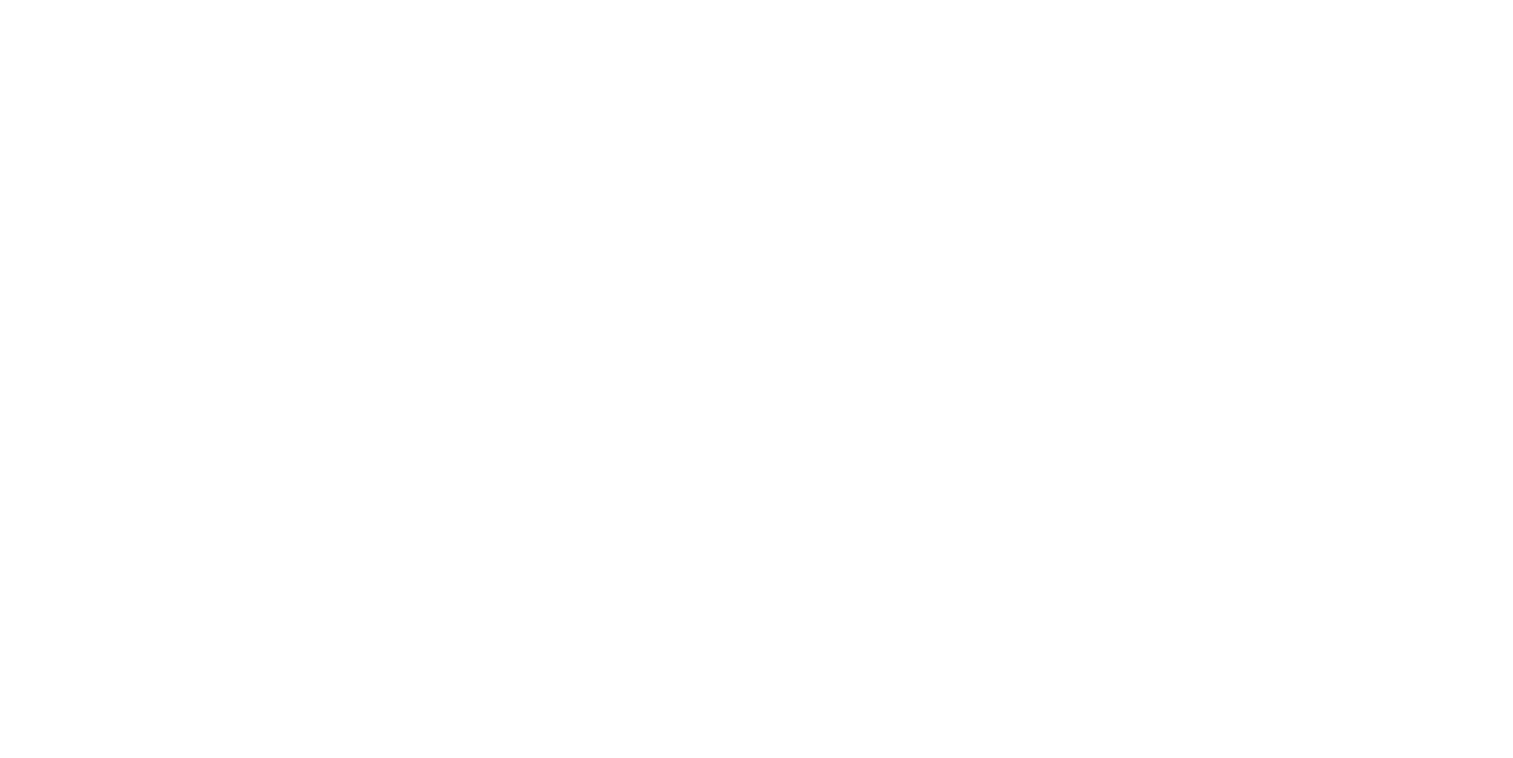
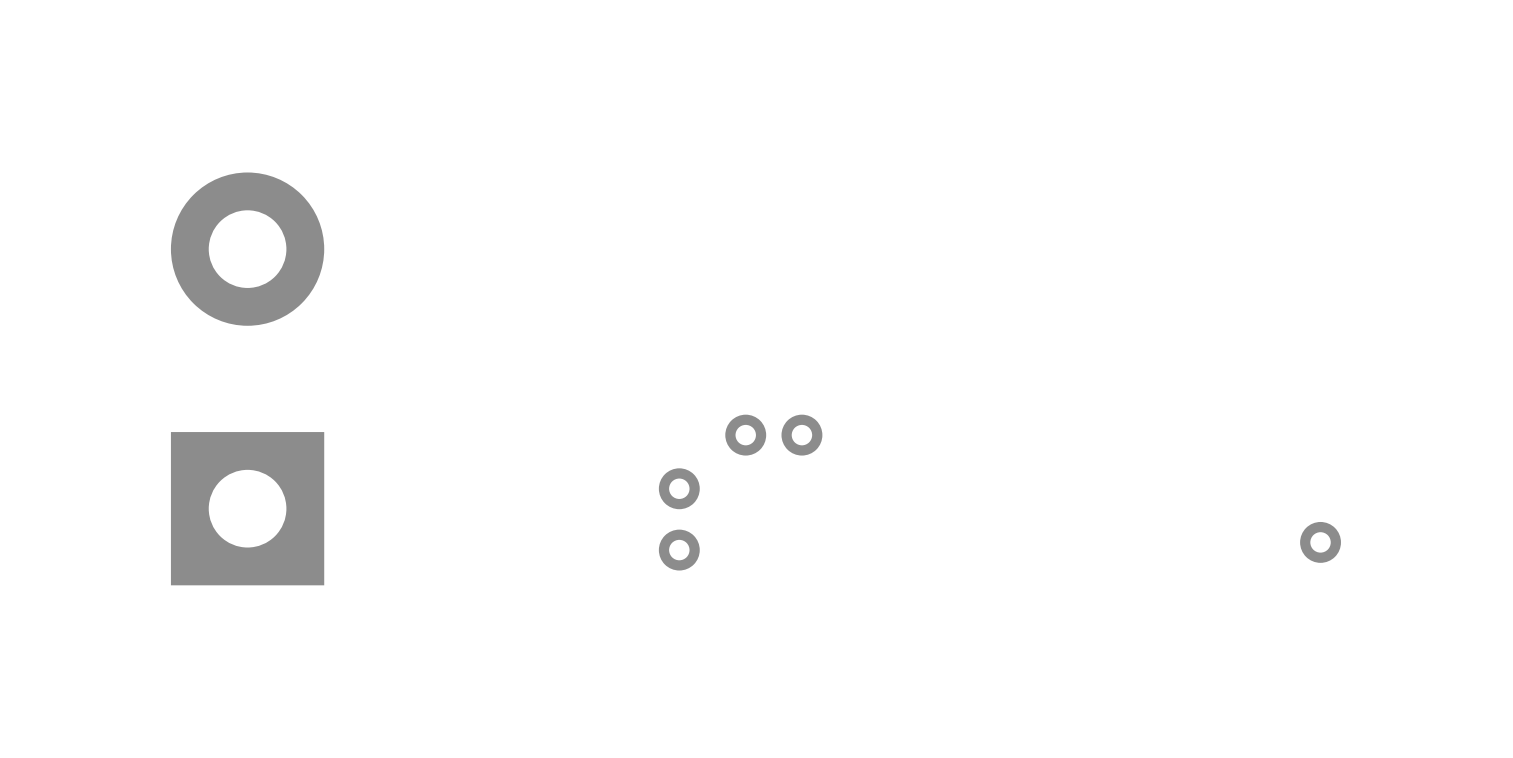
part: none -> (247, 378)
via: none -> (745, 435)
via: none -> (801, 435)
via: none -> (679, 488)
via: none -> (1320, 542)
via: none -> (679, 550)

